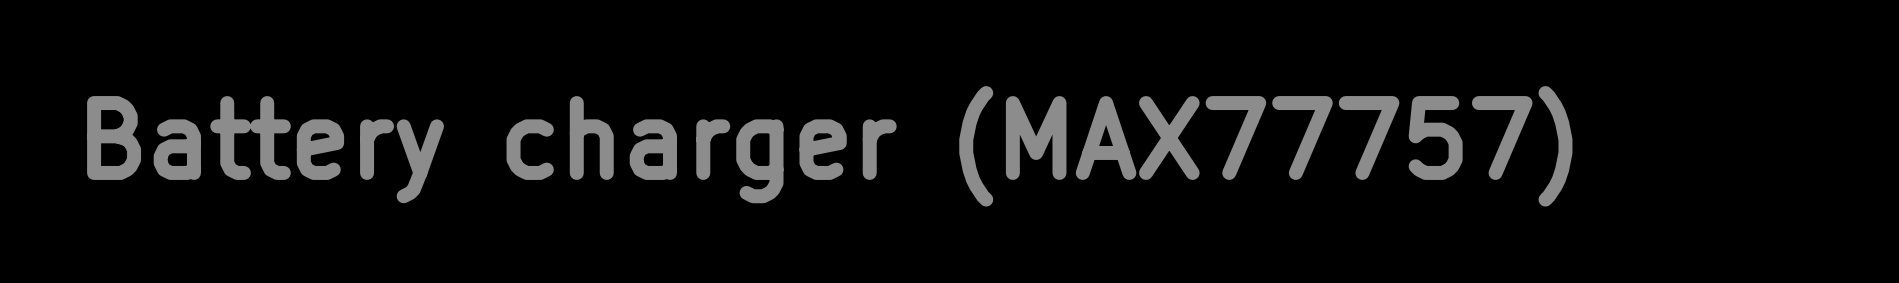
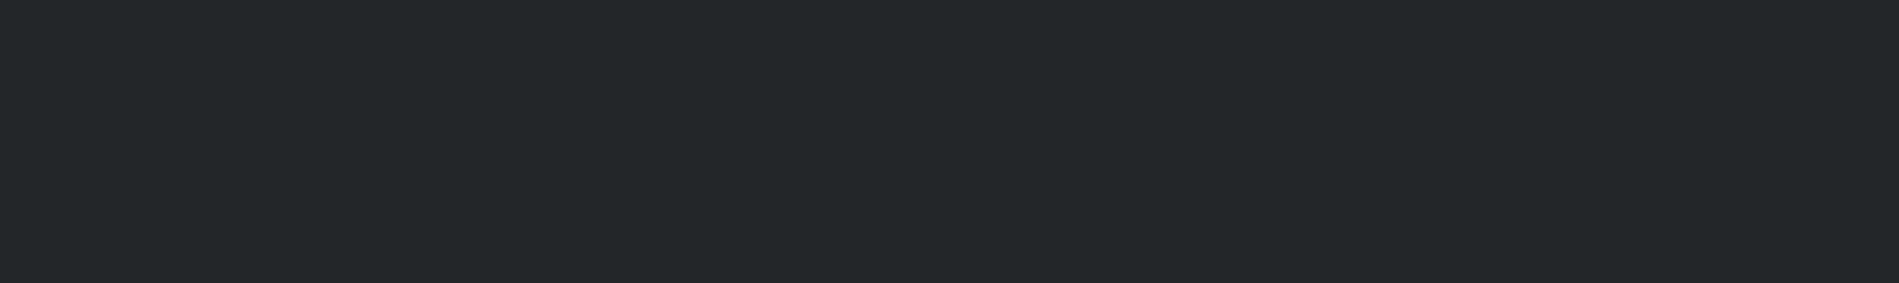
text: Battery charger (MAX77757) (829, 146) -> none

